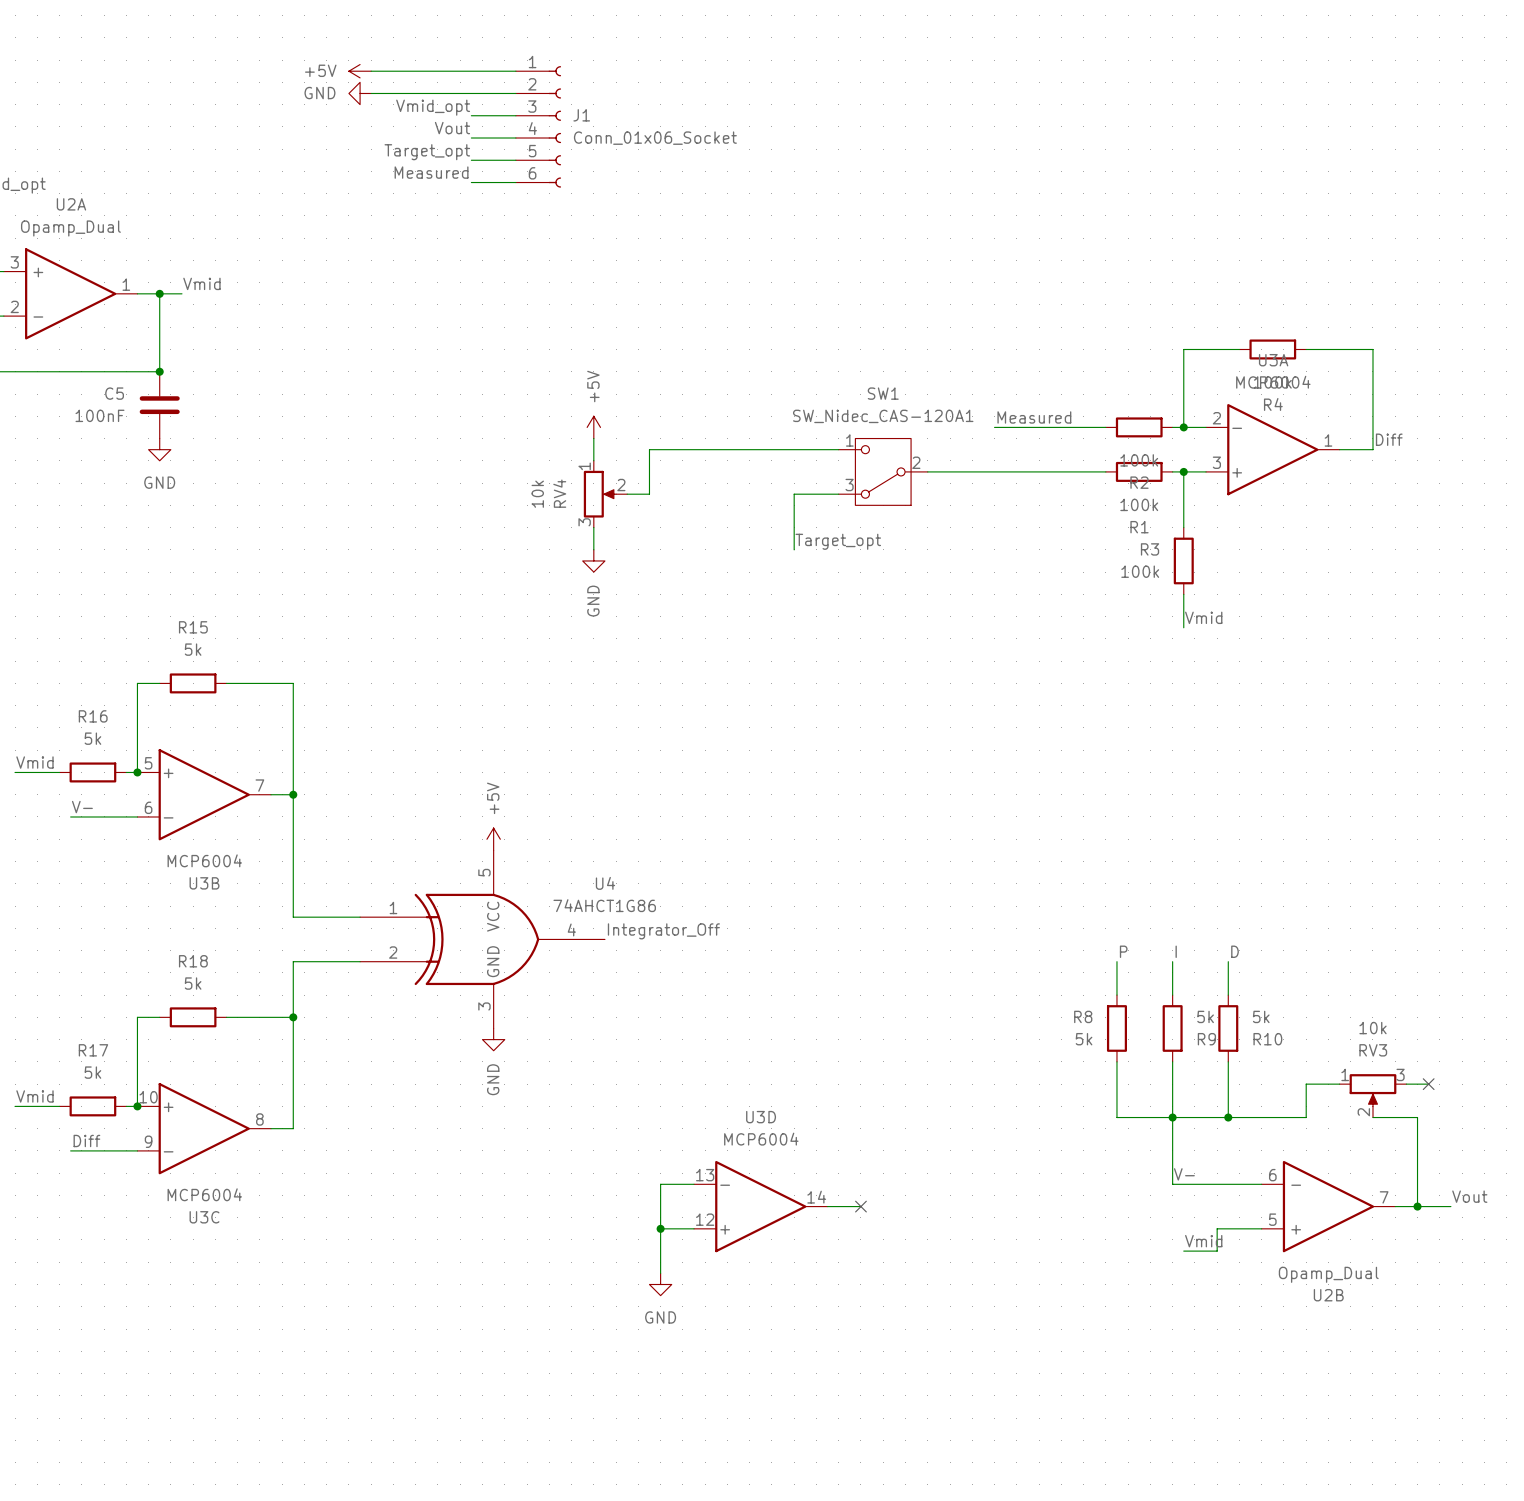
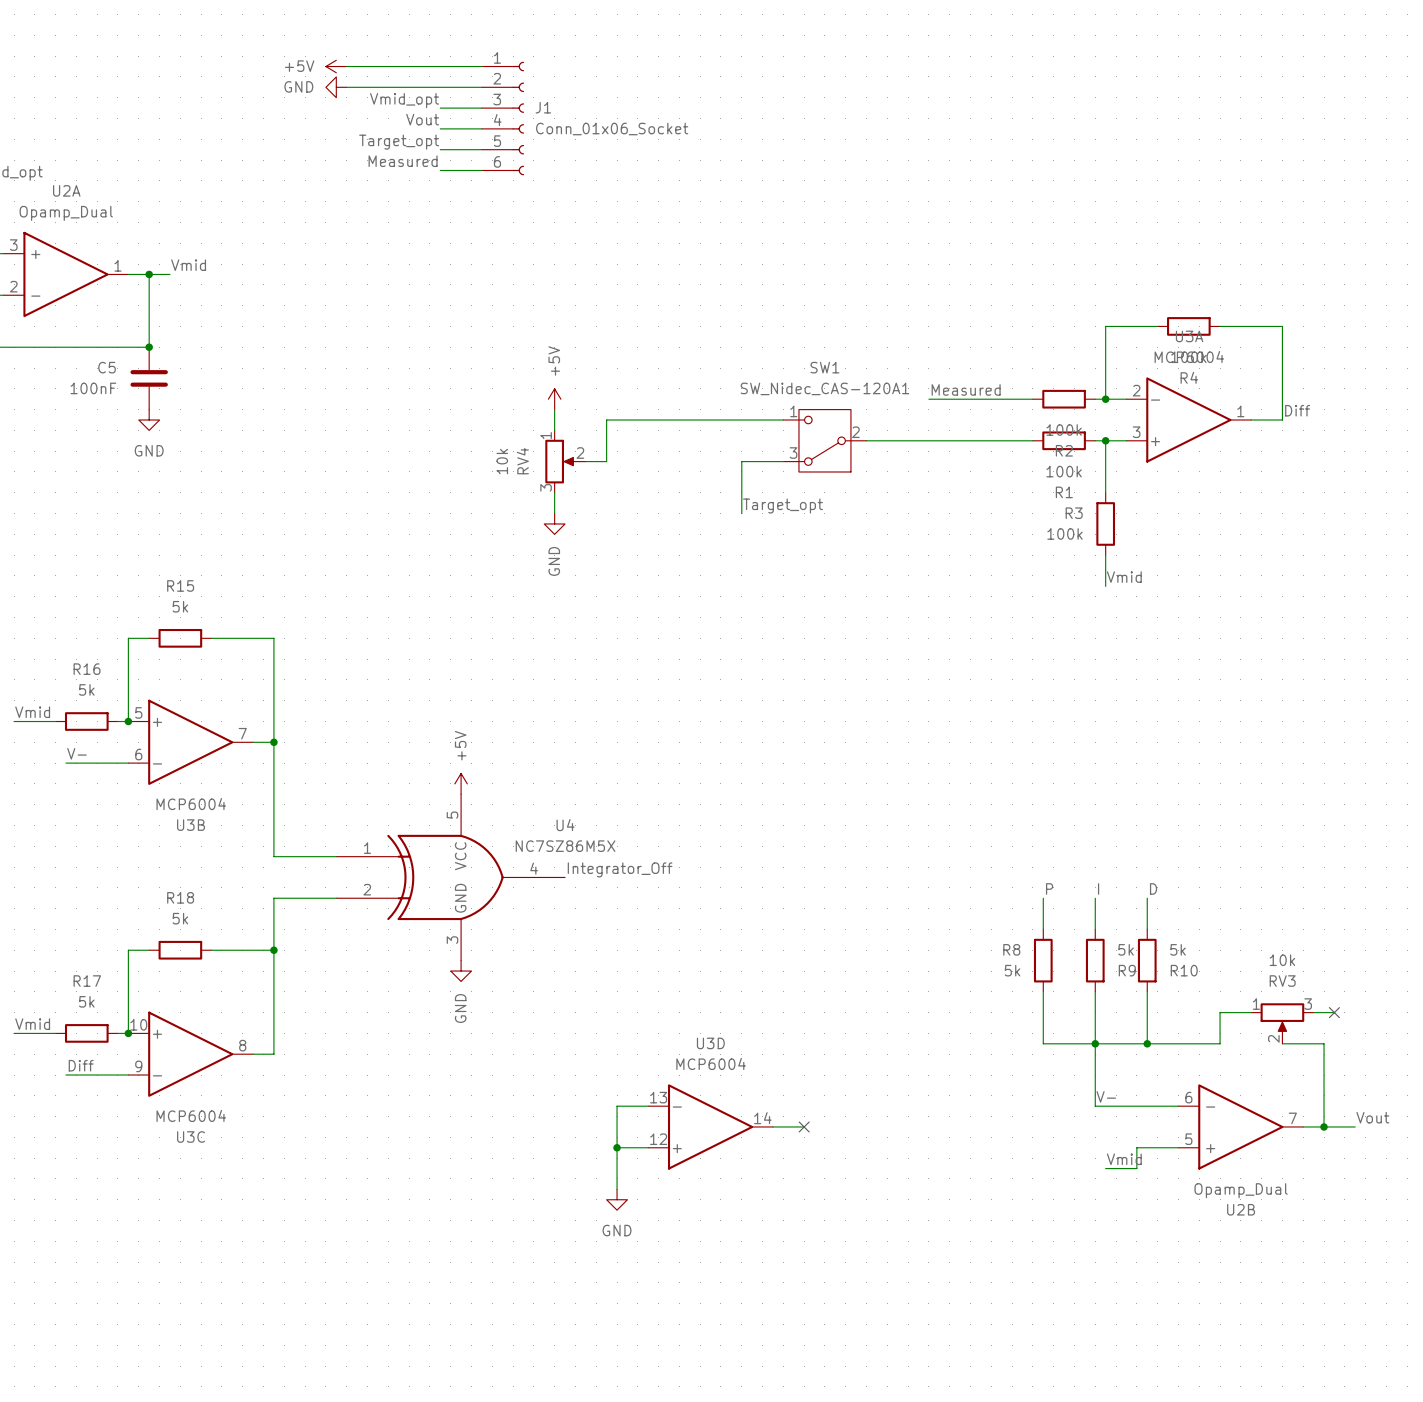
U4 value: 74AHCT1G86 (604, 905) -> NC7SZ86M5X (565, 846)

